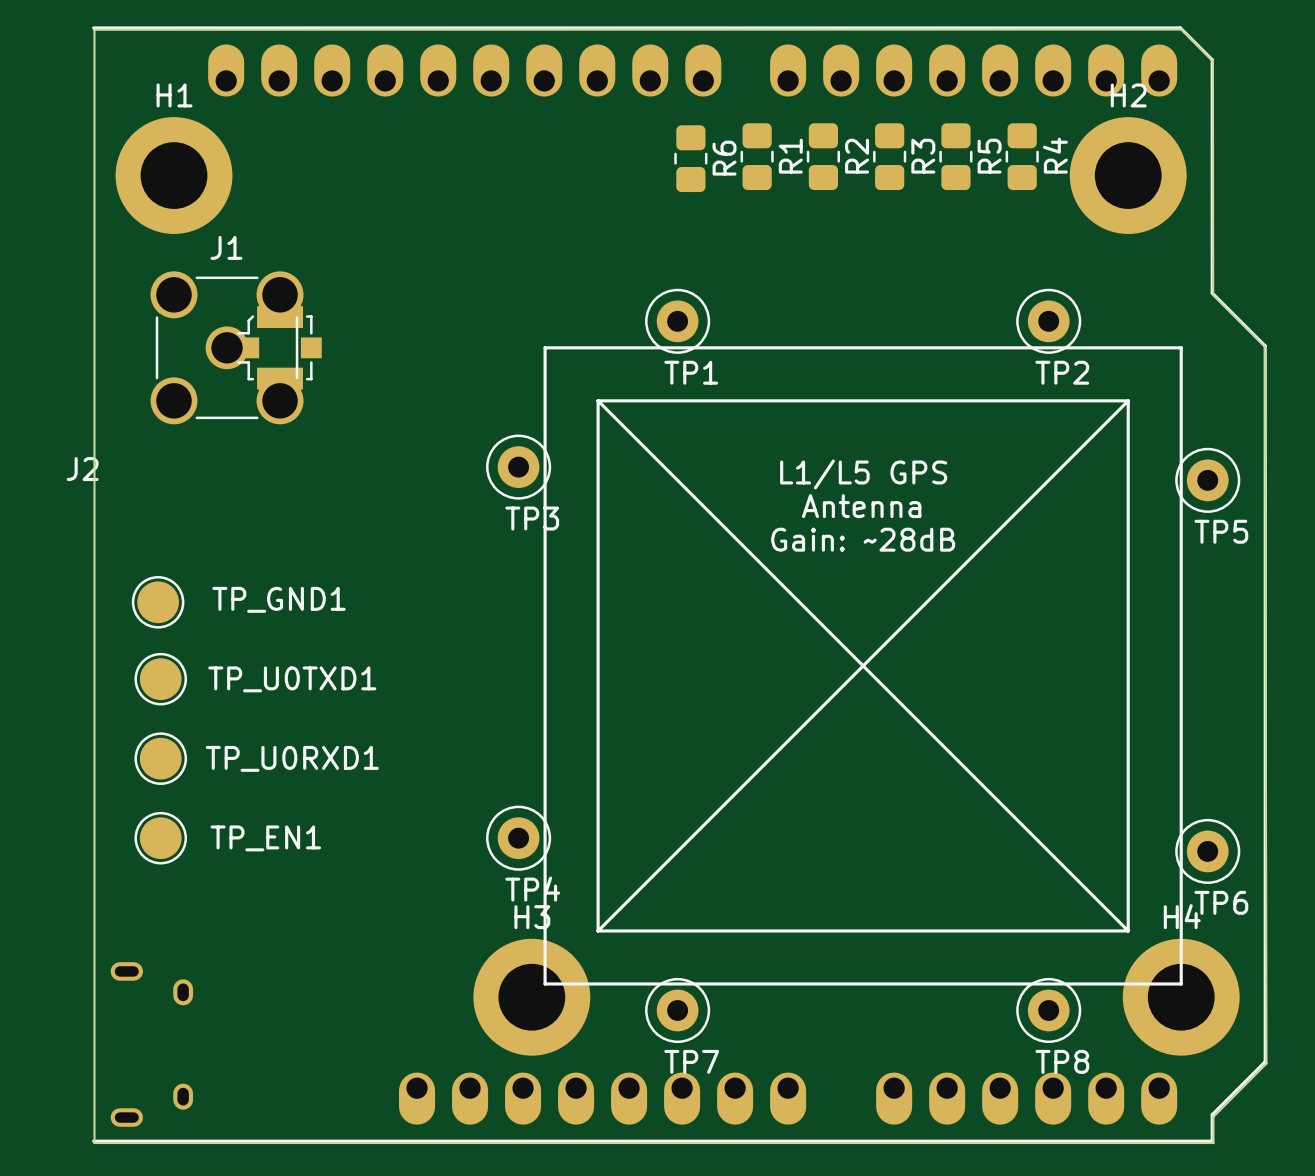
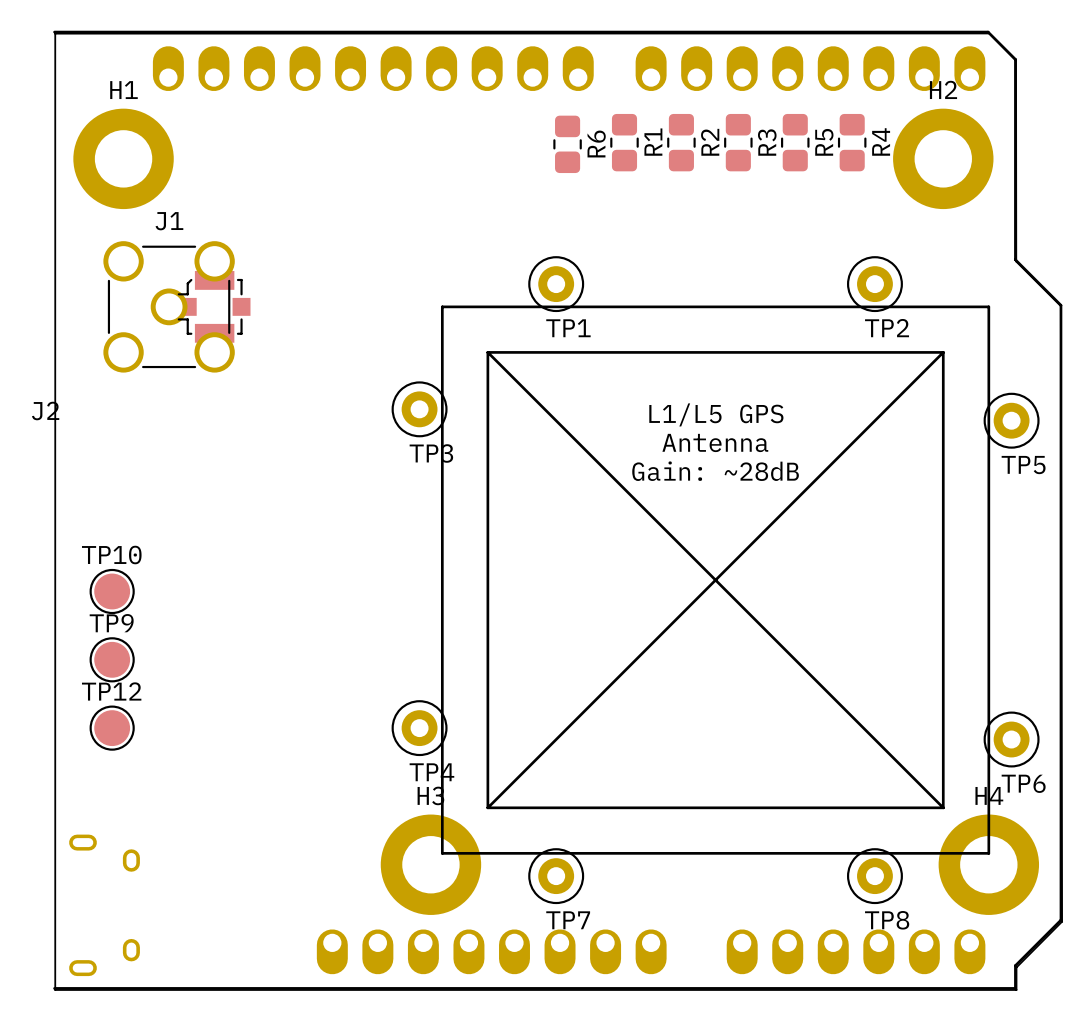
TP_GND1: (158, 602) -> none
TP_U0TXD1 name: TP_U0TXD1 (292, 679) -> TP10 (111, 555)
TP_U0RXD1 name: TP_U0RXD1 (292, 758) -> TP9 (111, 623)
TP_EN1 name: TP_EN1 (265, 838) -> TP12 (111, 691)

